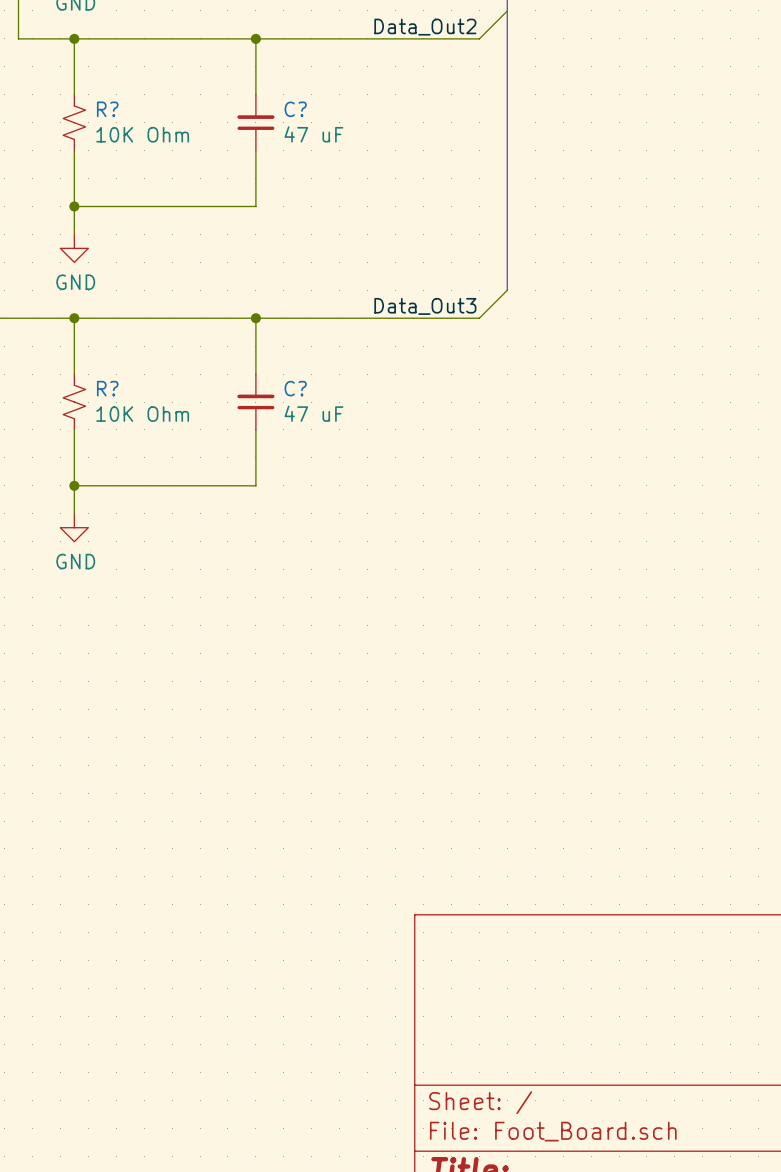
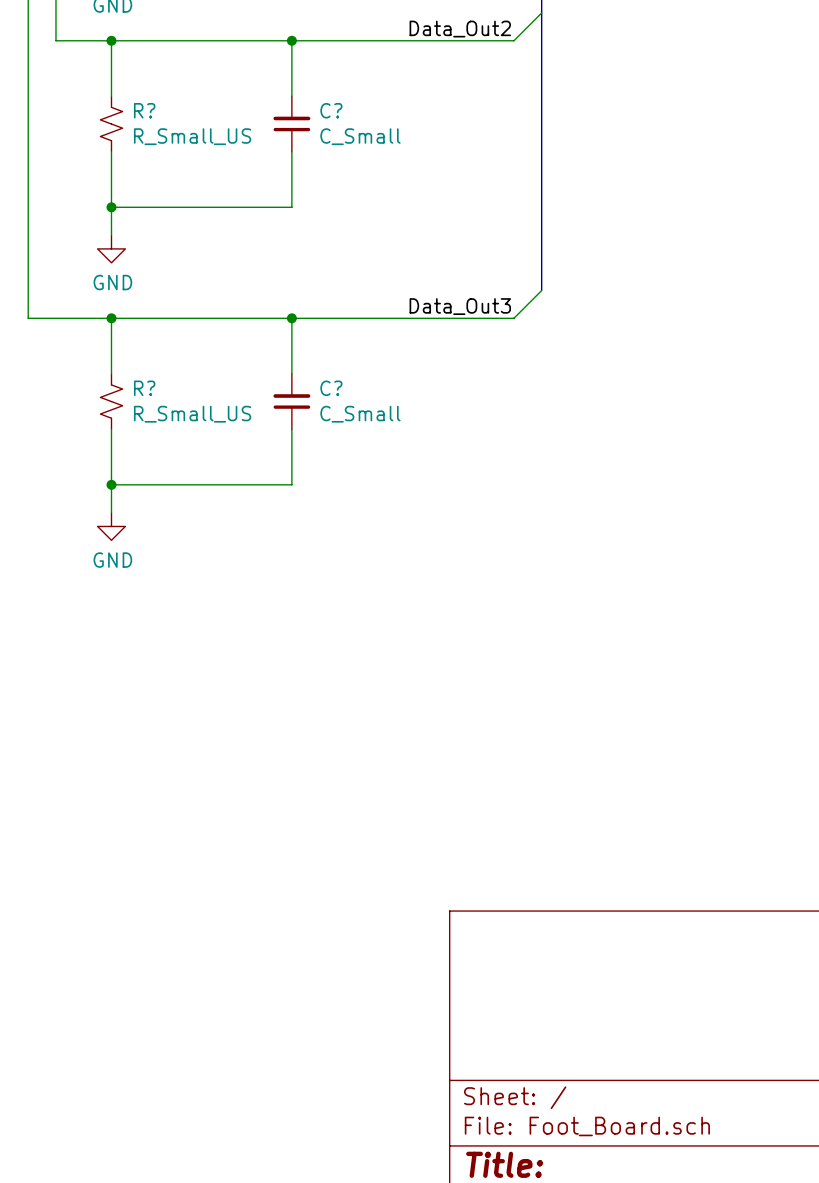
R? value: 10K Ohm (142, 134) -> R_Small_US (192, 136)
C? value: 47 uF (313, 134) -> C_Small (360, 136)
C? value: 47 uF (313, 413) -> C_Small (360, 414)
R? value: 10K Ohm (142, 414) -> R_Small_US (192, 414)

